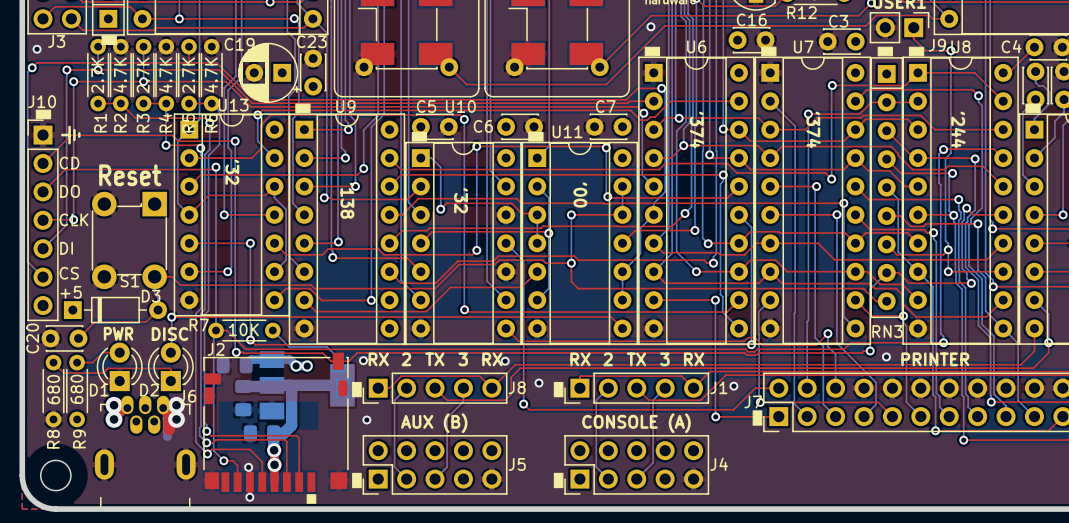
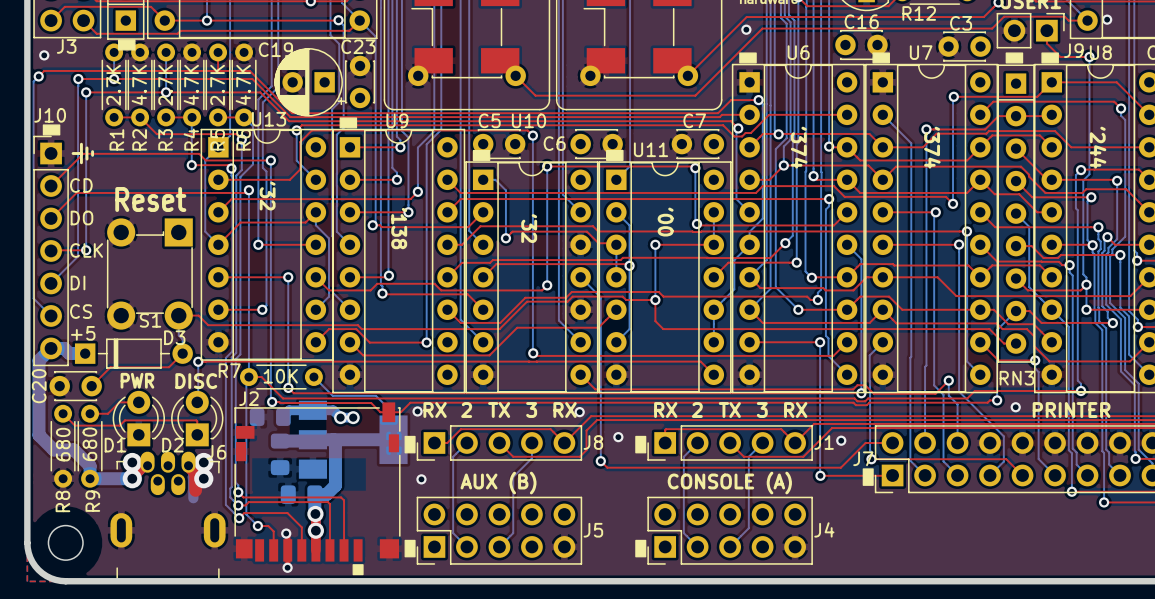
via: none -> (1107, 19)
bottom track: none -> (85, 353) (69, 353) (64, 348) (51, 348) (39, 360) (39, 435) (53, 449) (73, 449) (90, 466) (90, 478) (132, 478)

